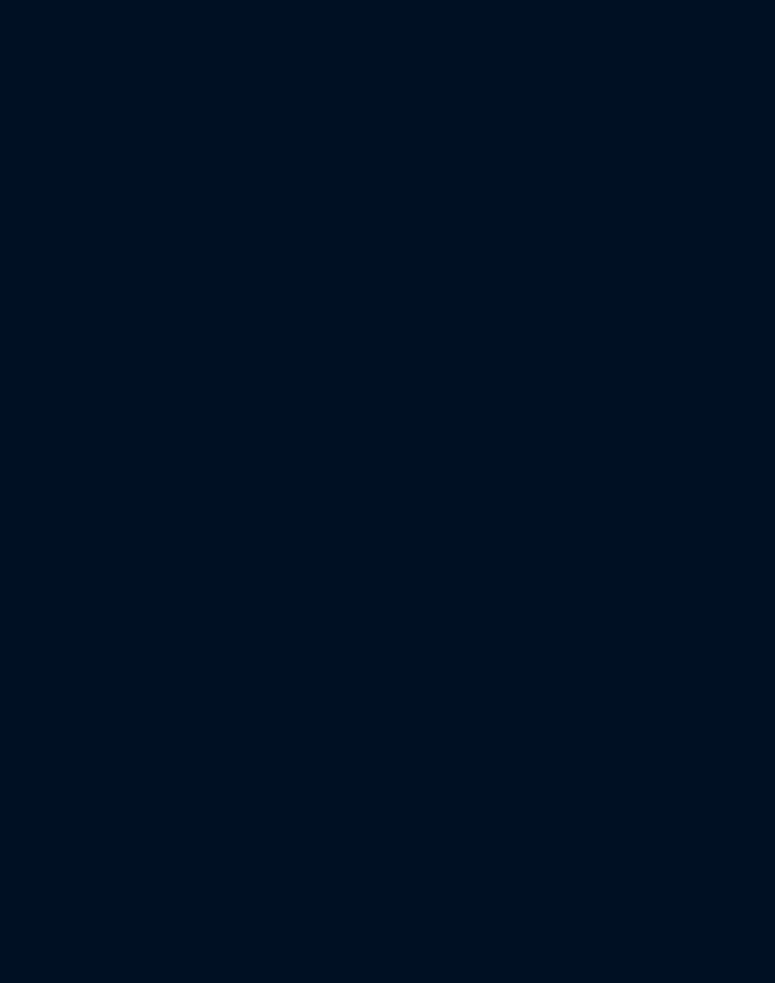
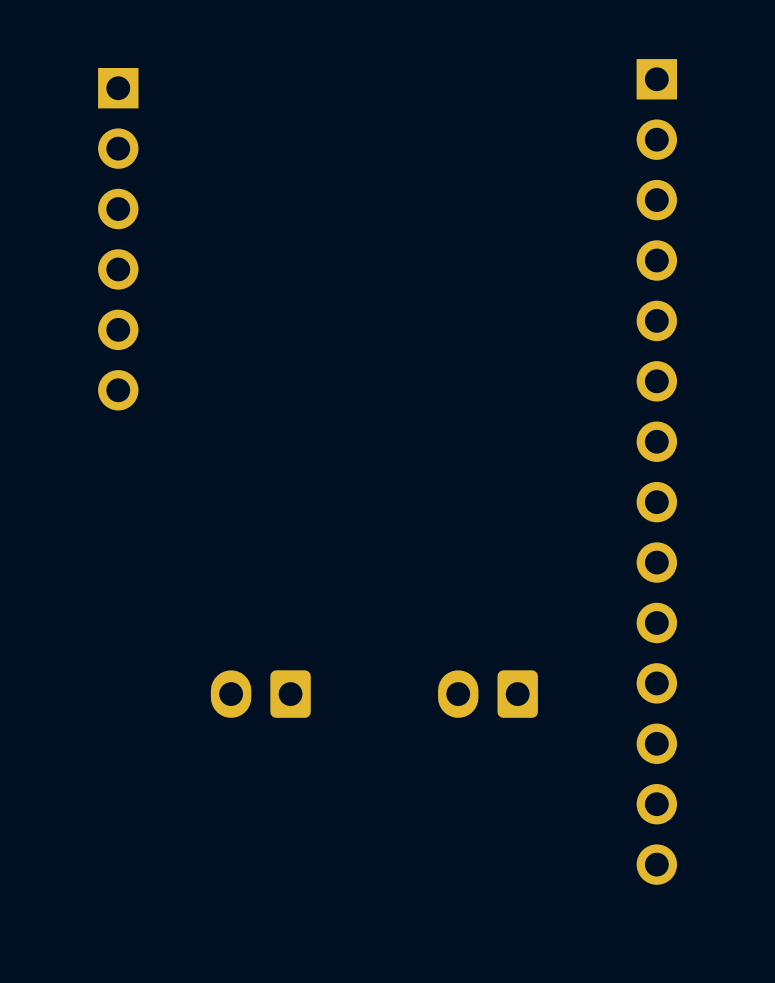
part: none -> (118, 239)
part: none -> (656, 471)
part: none -> (260, 694)
part: none -> (487, 694)

